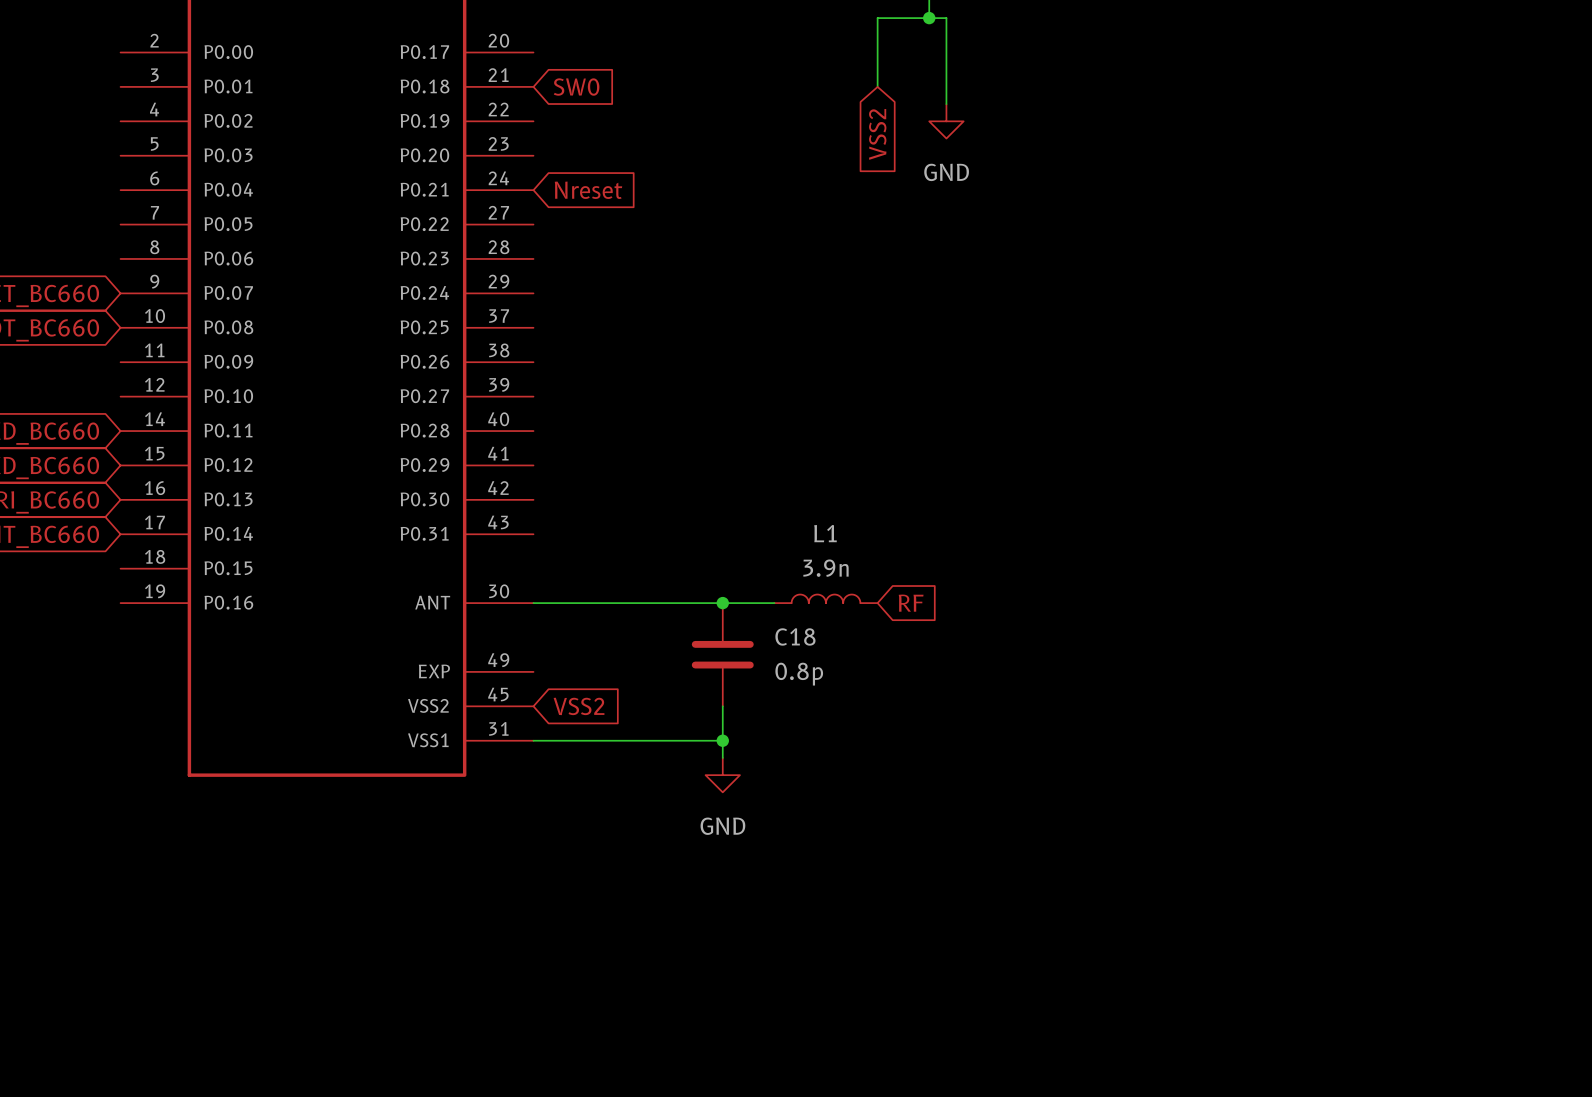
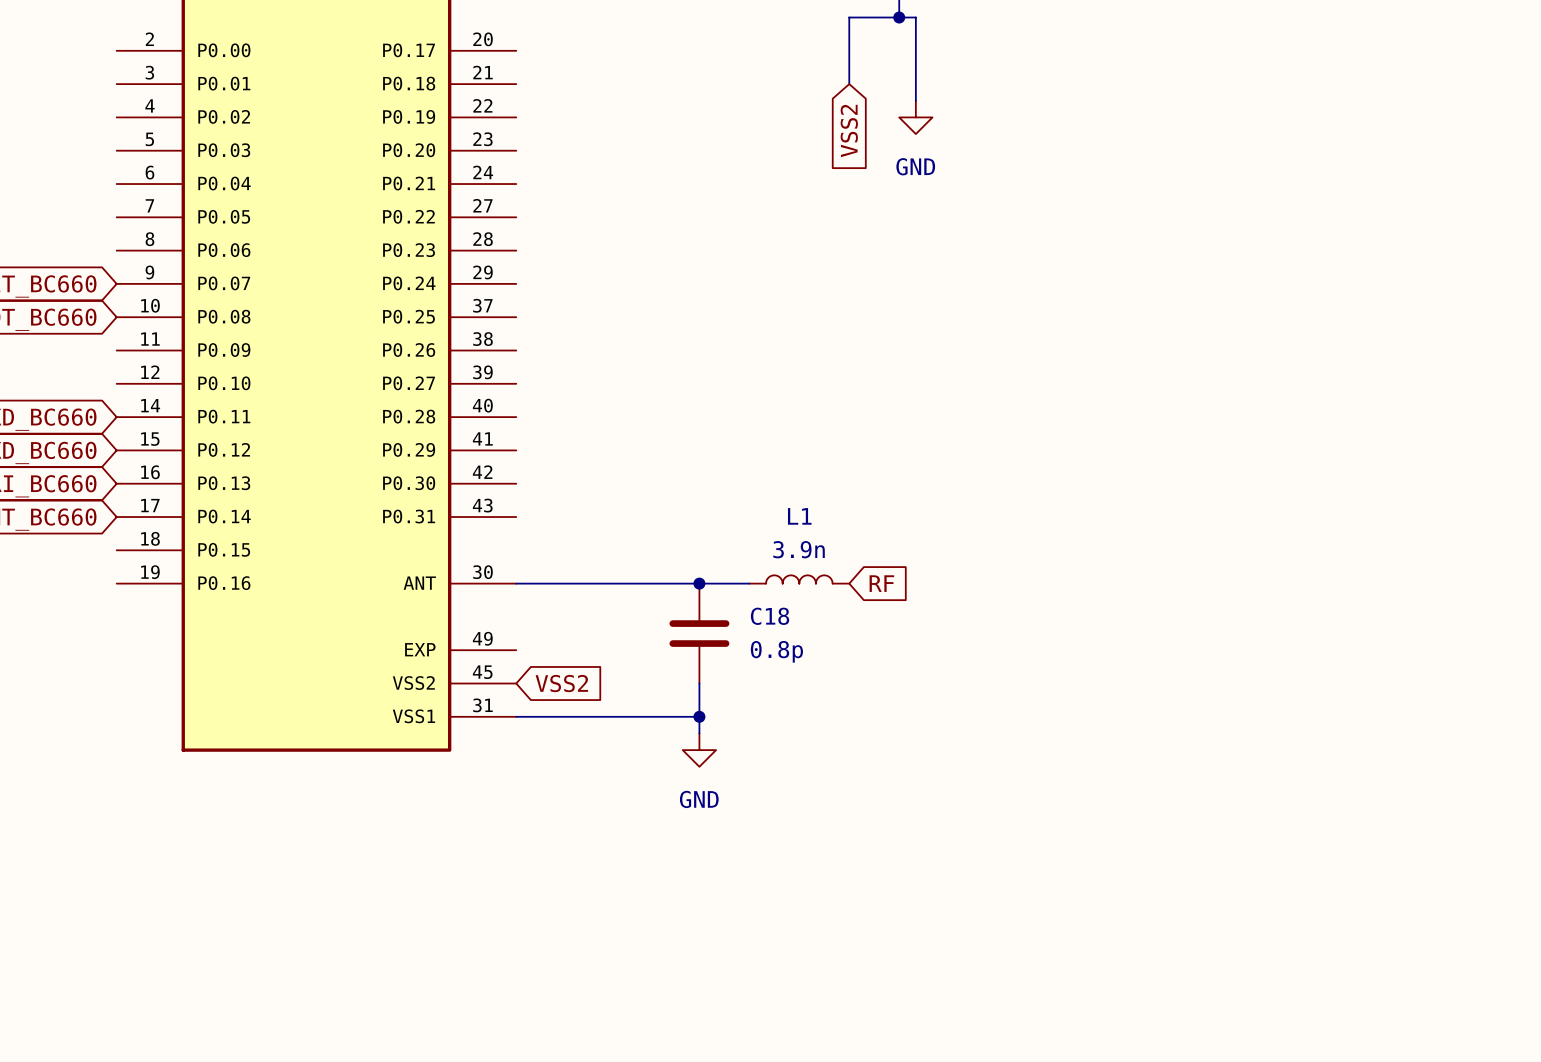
global label: SW0 (576, 87) -> none
global label: Nreset (588, 190) -> none

